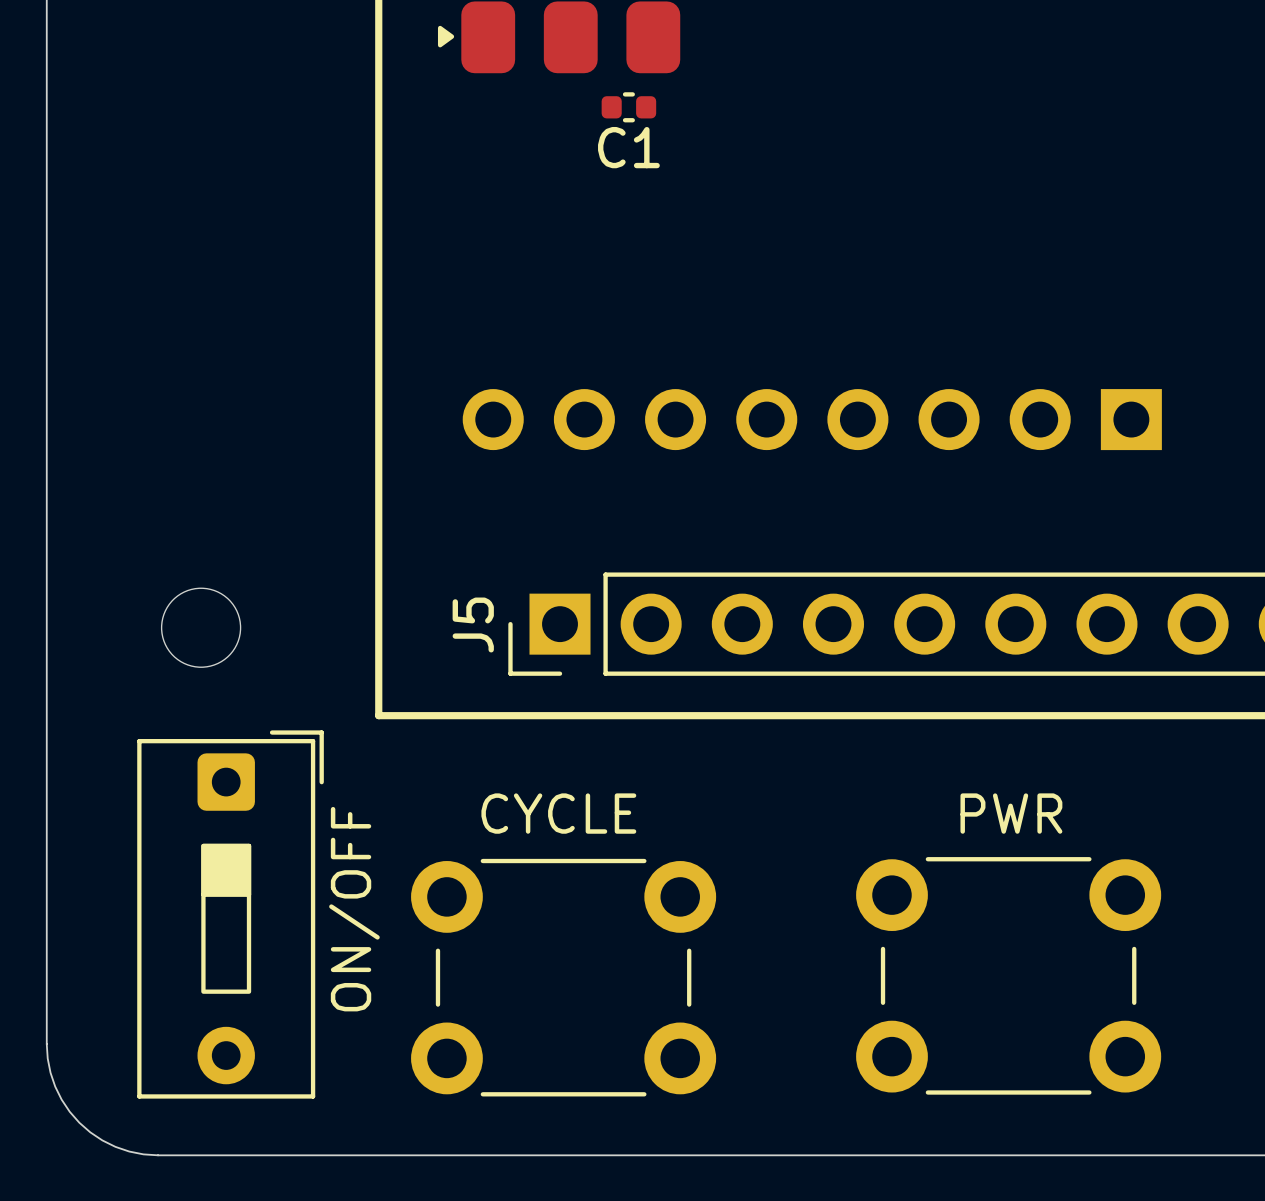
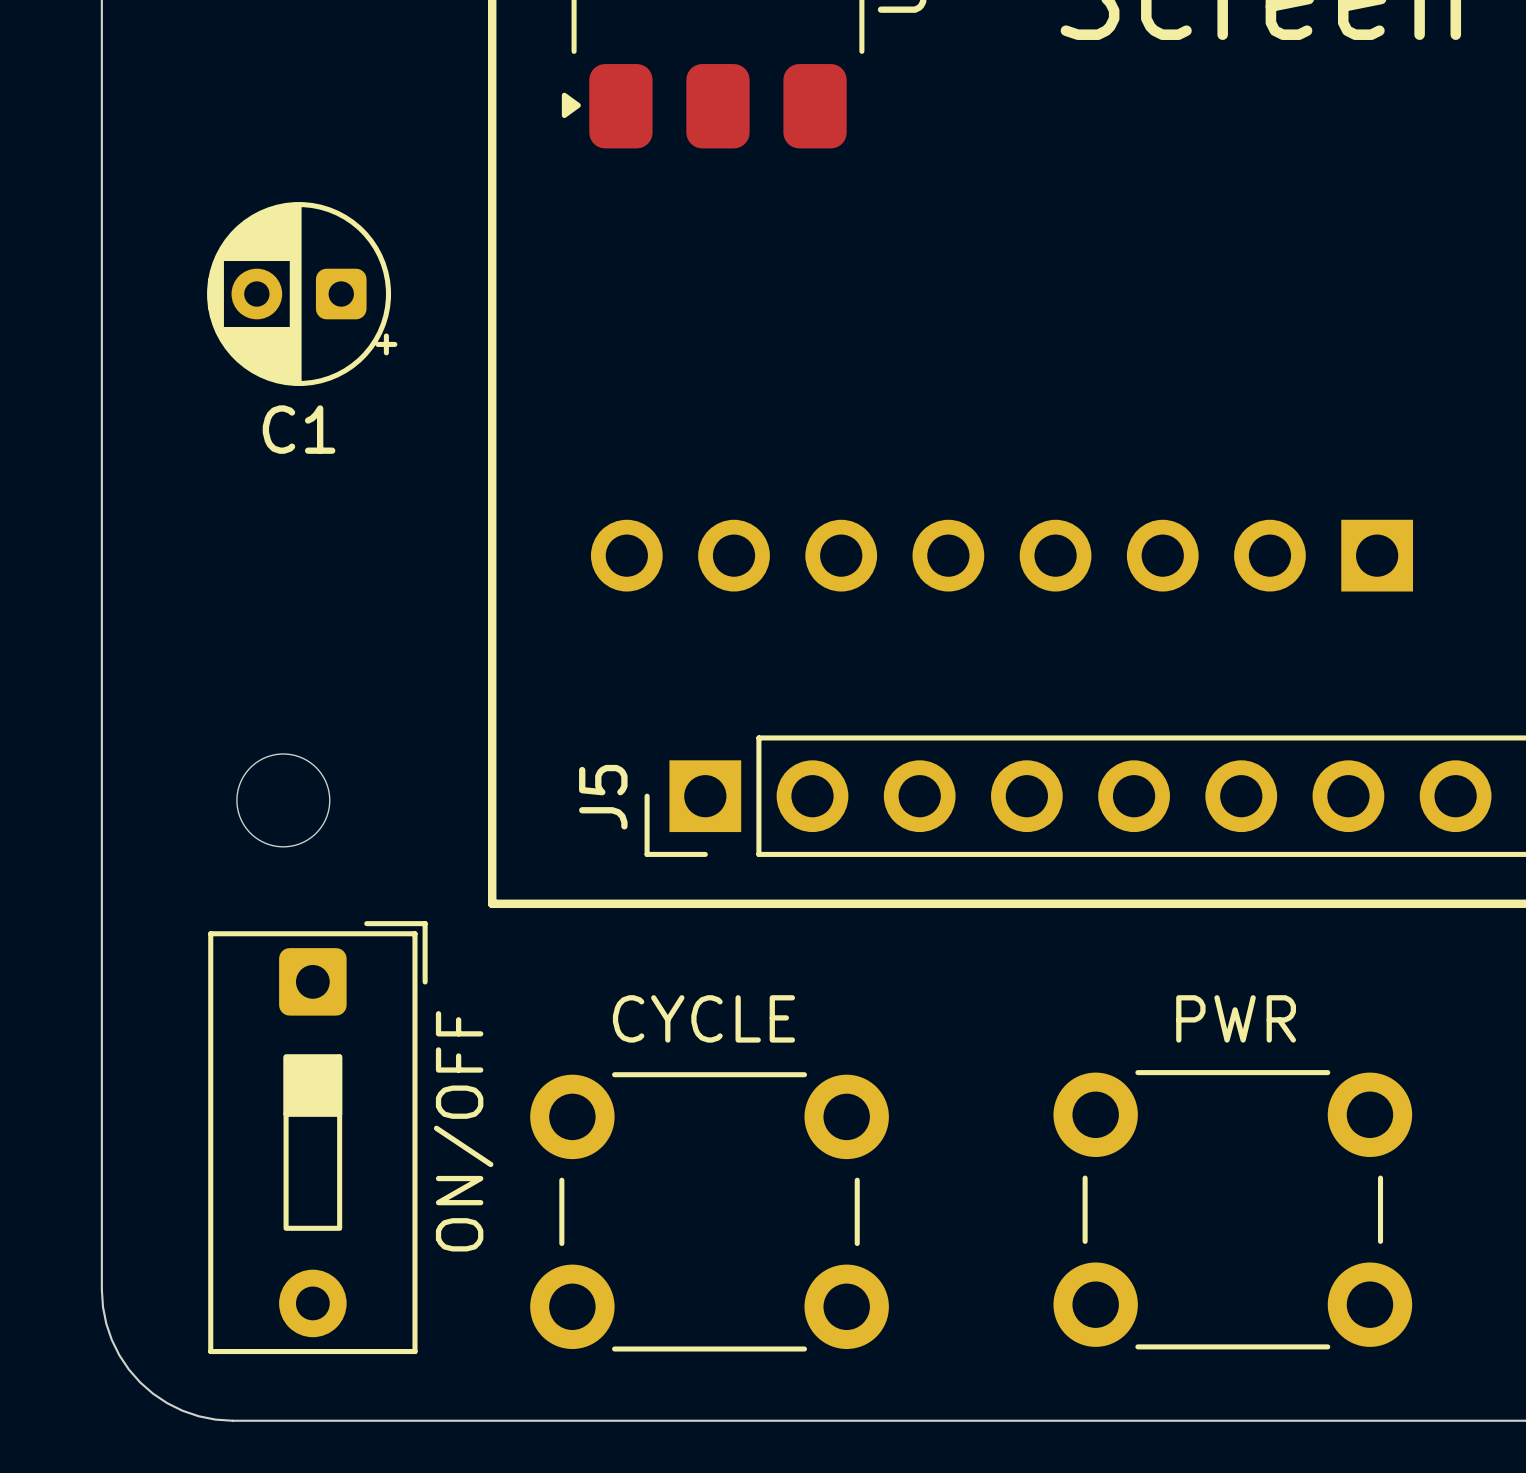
C1 footprint: [601, 92, 657, 123] -> [207, 202, 398, 387]
C1 name position: C1 (628, 147) -> C1 (299, 429)

